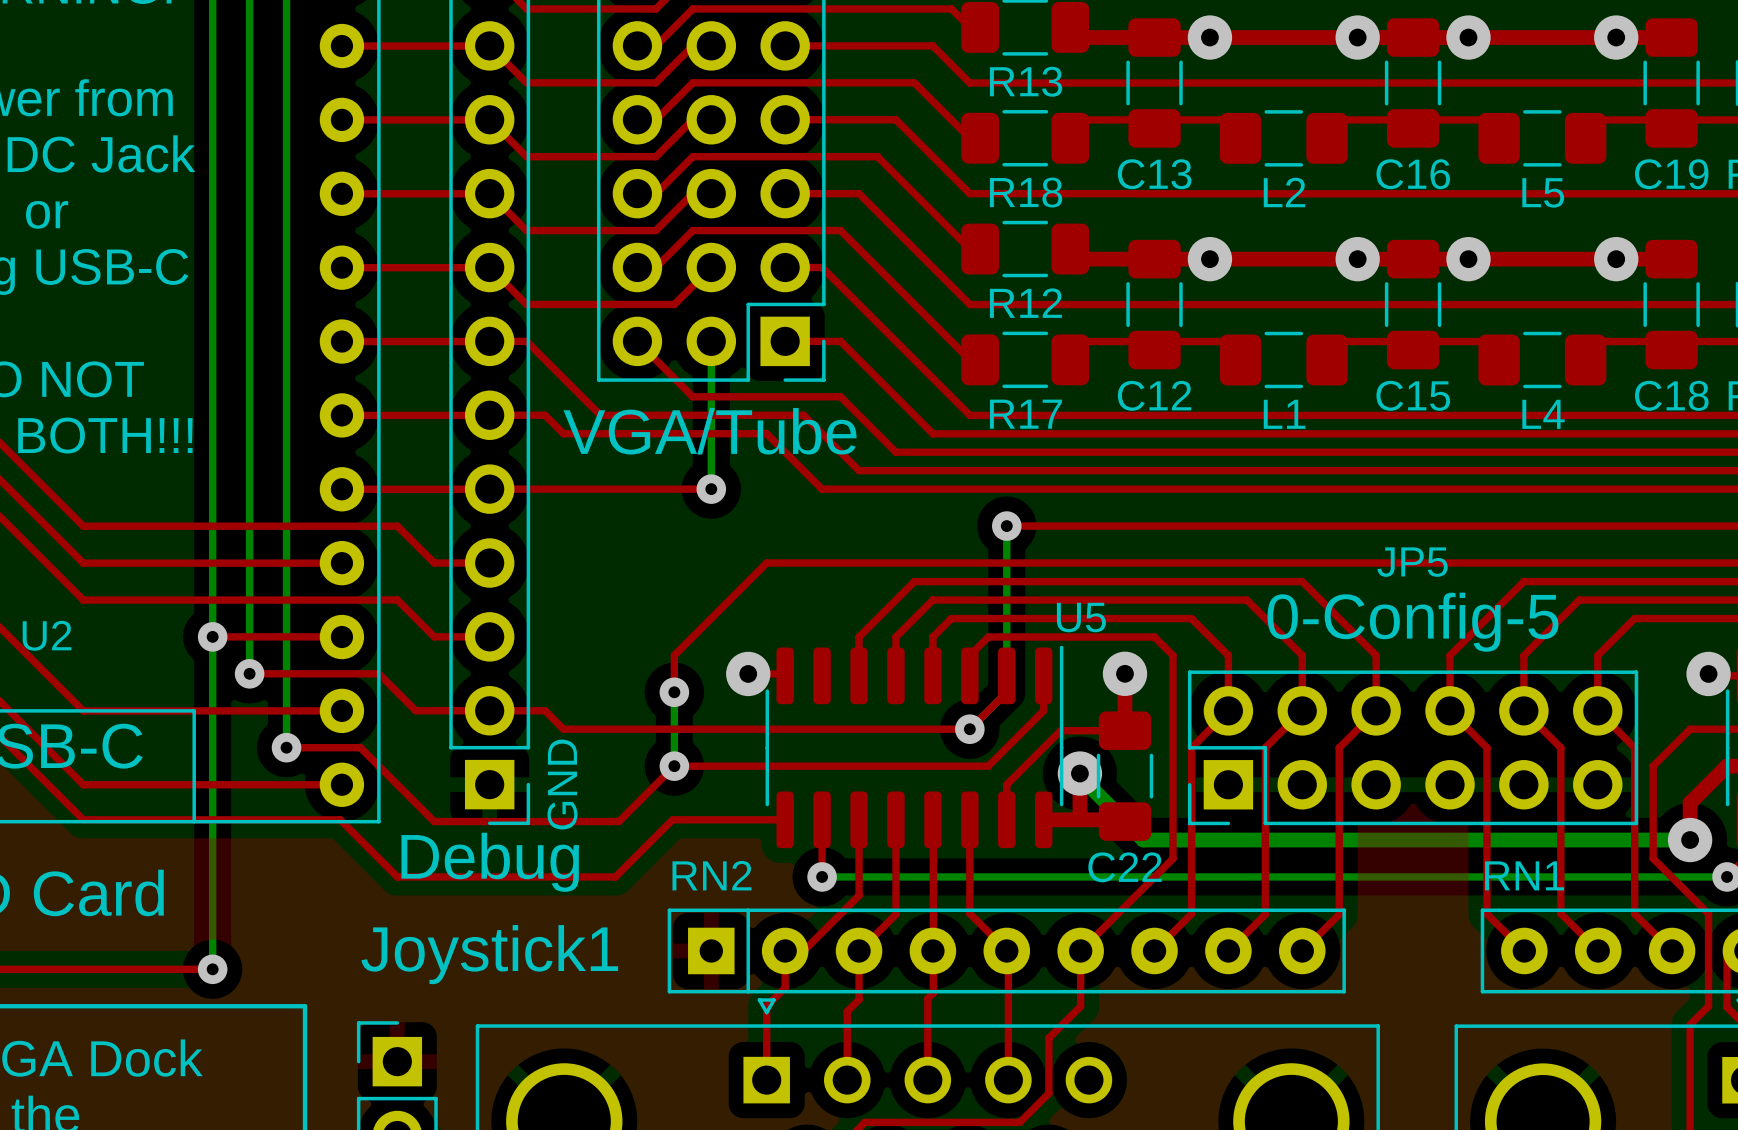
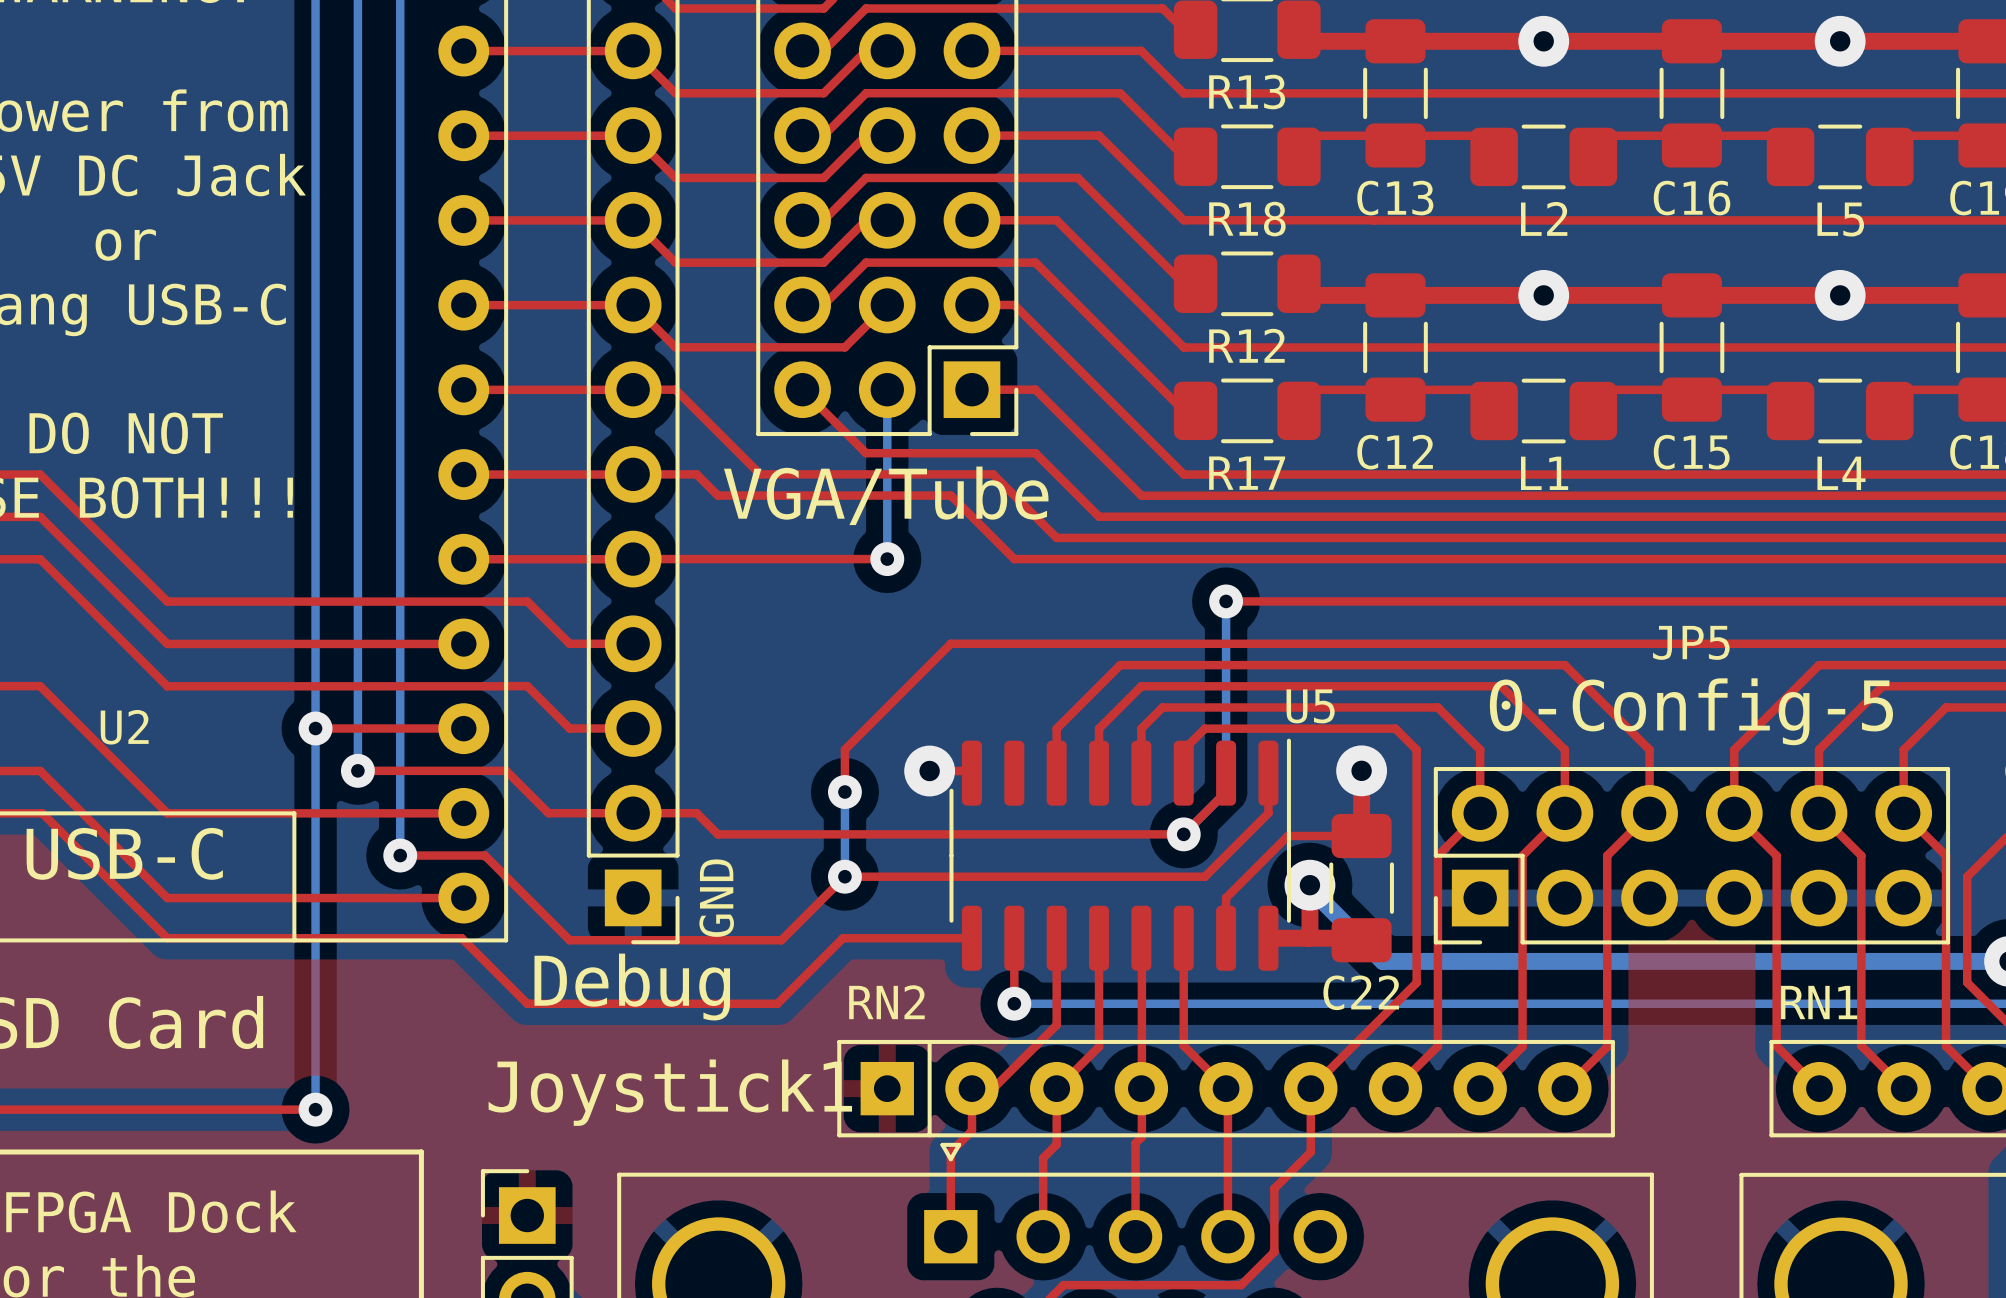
via: (1209, 37) -> none
via: none -> (1543, 41)
via: (1357, 37) -> none
via: (1468, 37) -> none
via: none -> (1840, 41)
via: (1616, 37) -> none
via: (1209, 259) -> none
via: none -> (1543, 295)
via: (1357, 259) -> none
via: (1468, 259) -> none
via: none -> (1840, 295)
via: (1616, 259) -> none

